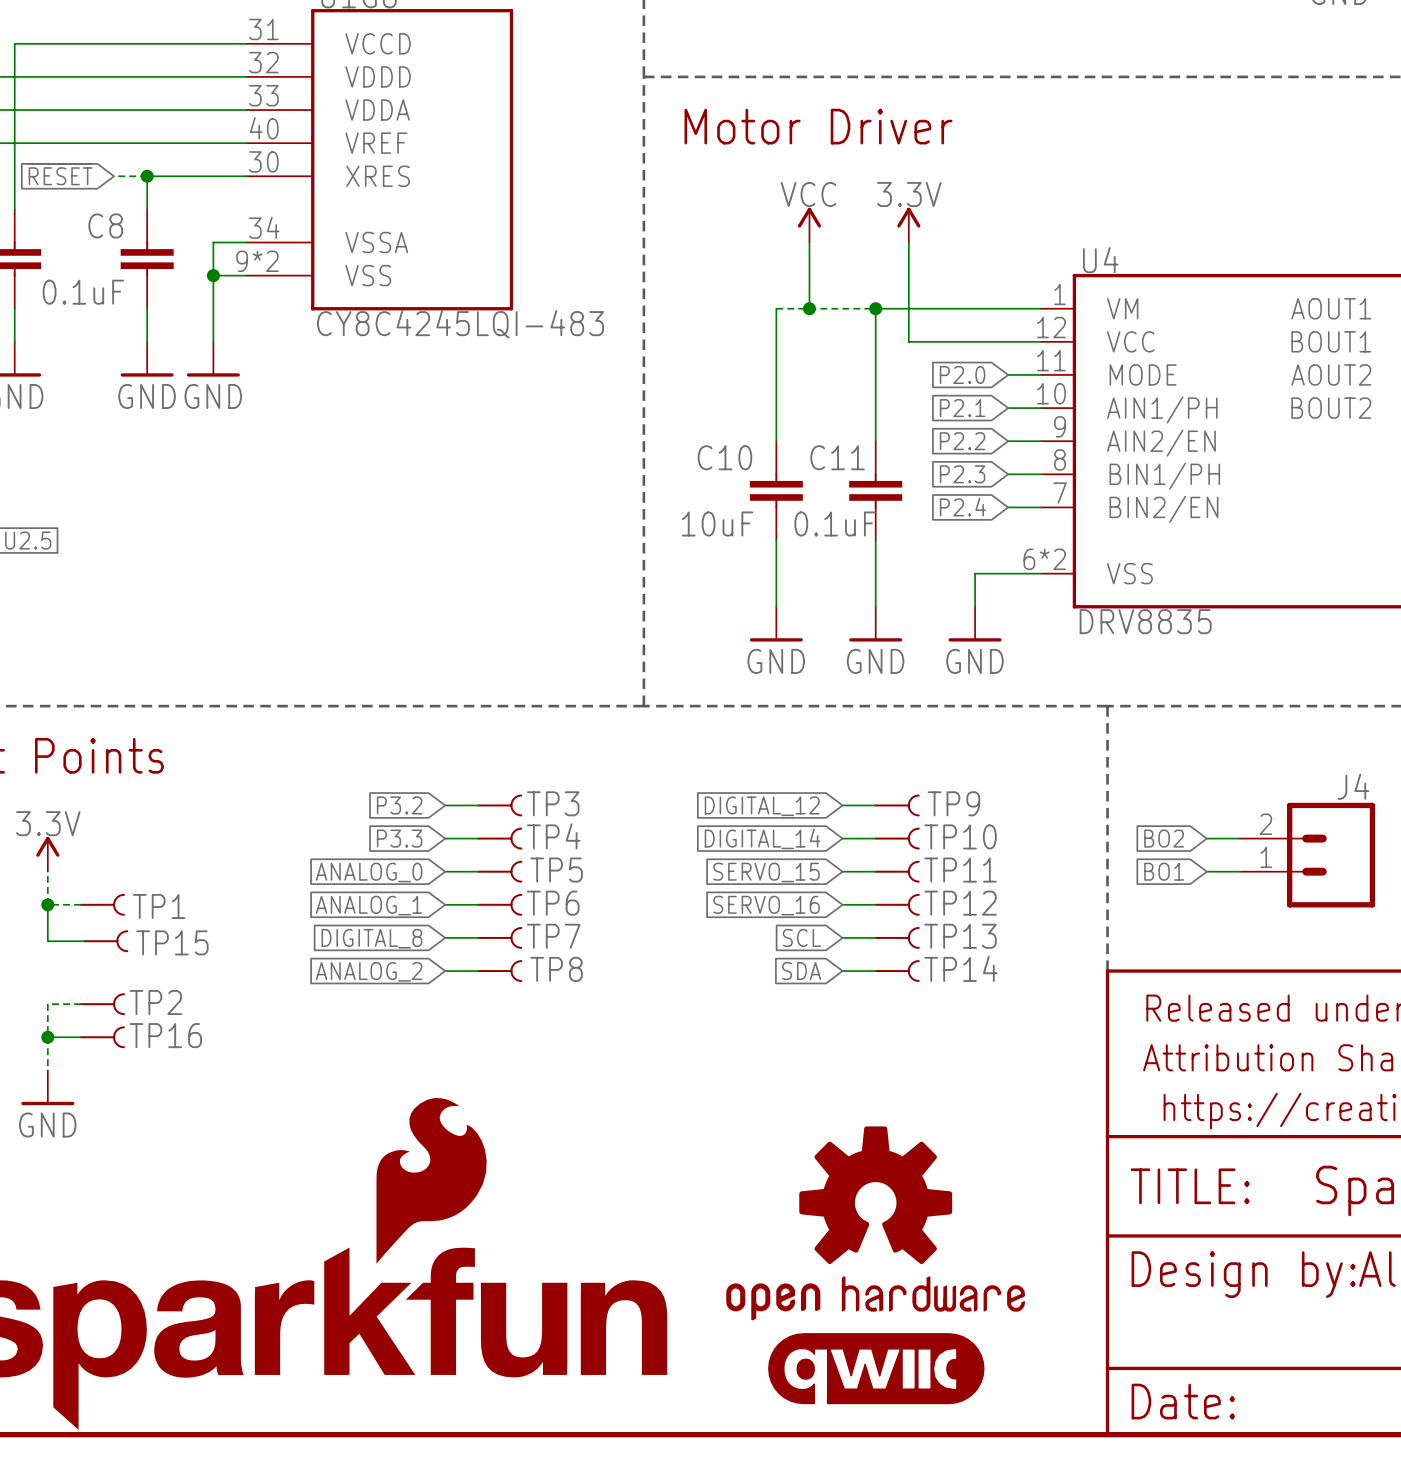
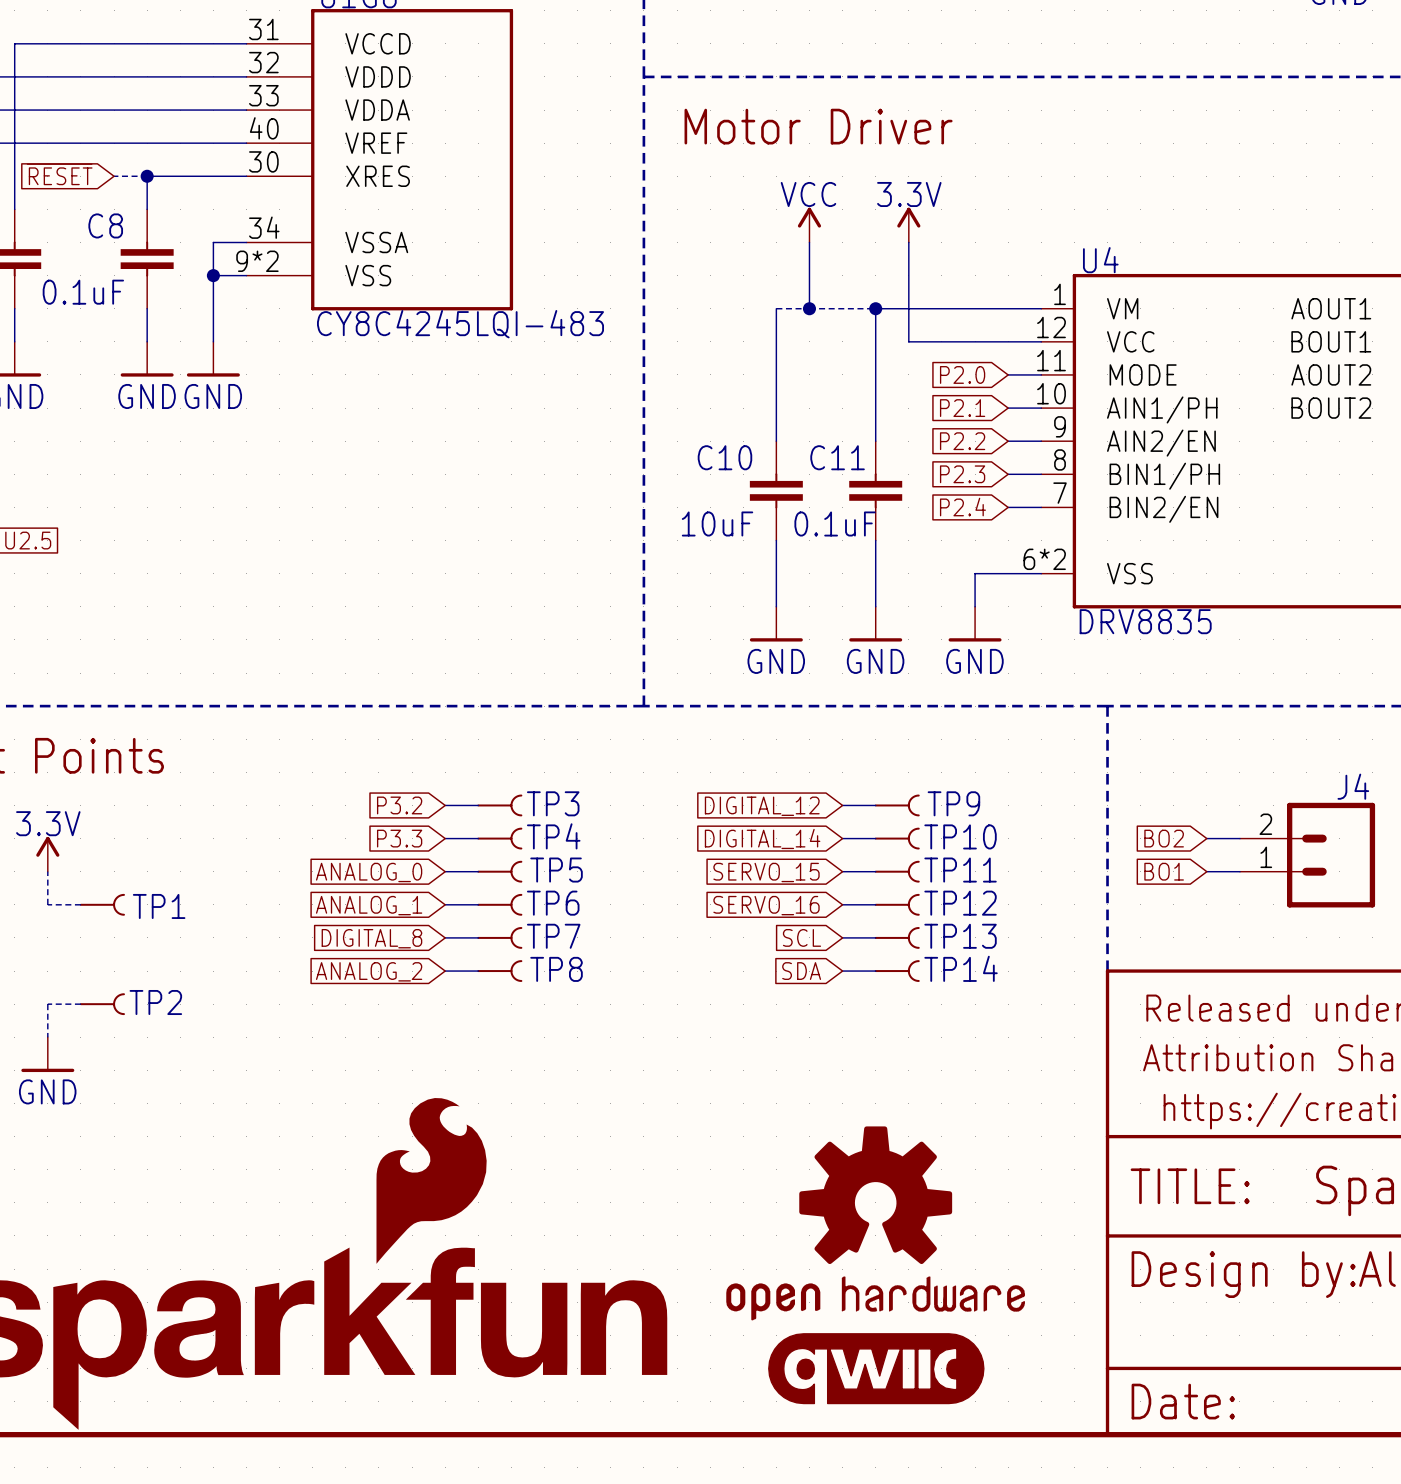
wire: (47, 904) (47, 941) (84, 941) -> none
junction: (47, 904) -> none
TP15: (105, 941) -> none
junction: (47, 1037) -> none
wire: (80, 1037) (47, 1037) (47, 1070) -> none
TP16: (102, 1037) -> none
power symbol position: GND (47, 1087) -> GND (47, 1054)

